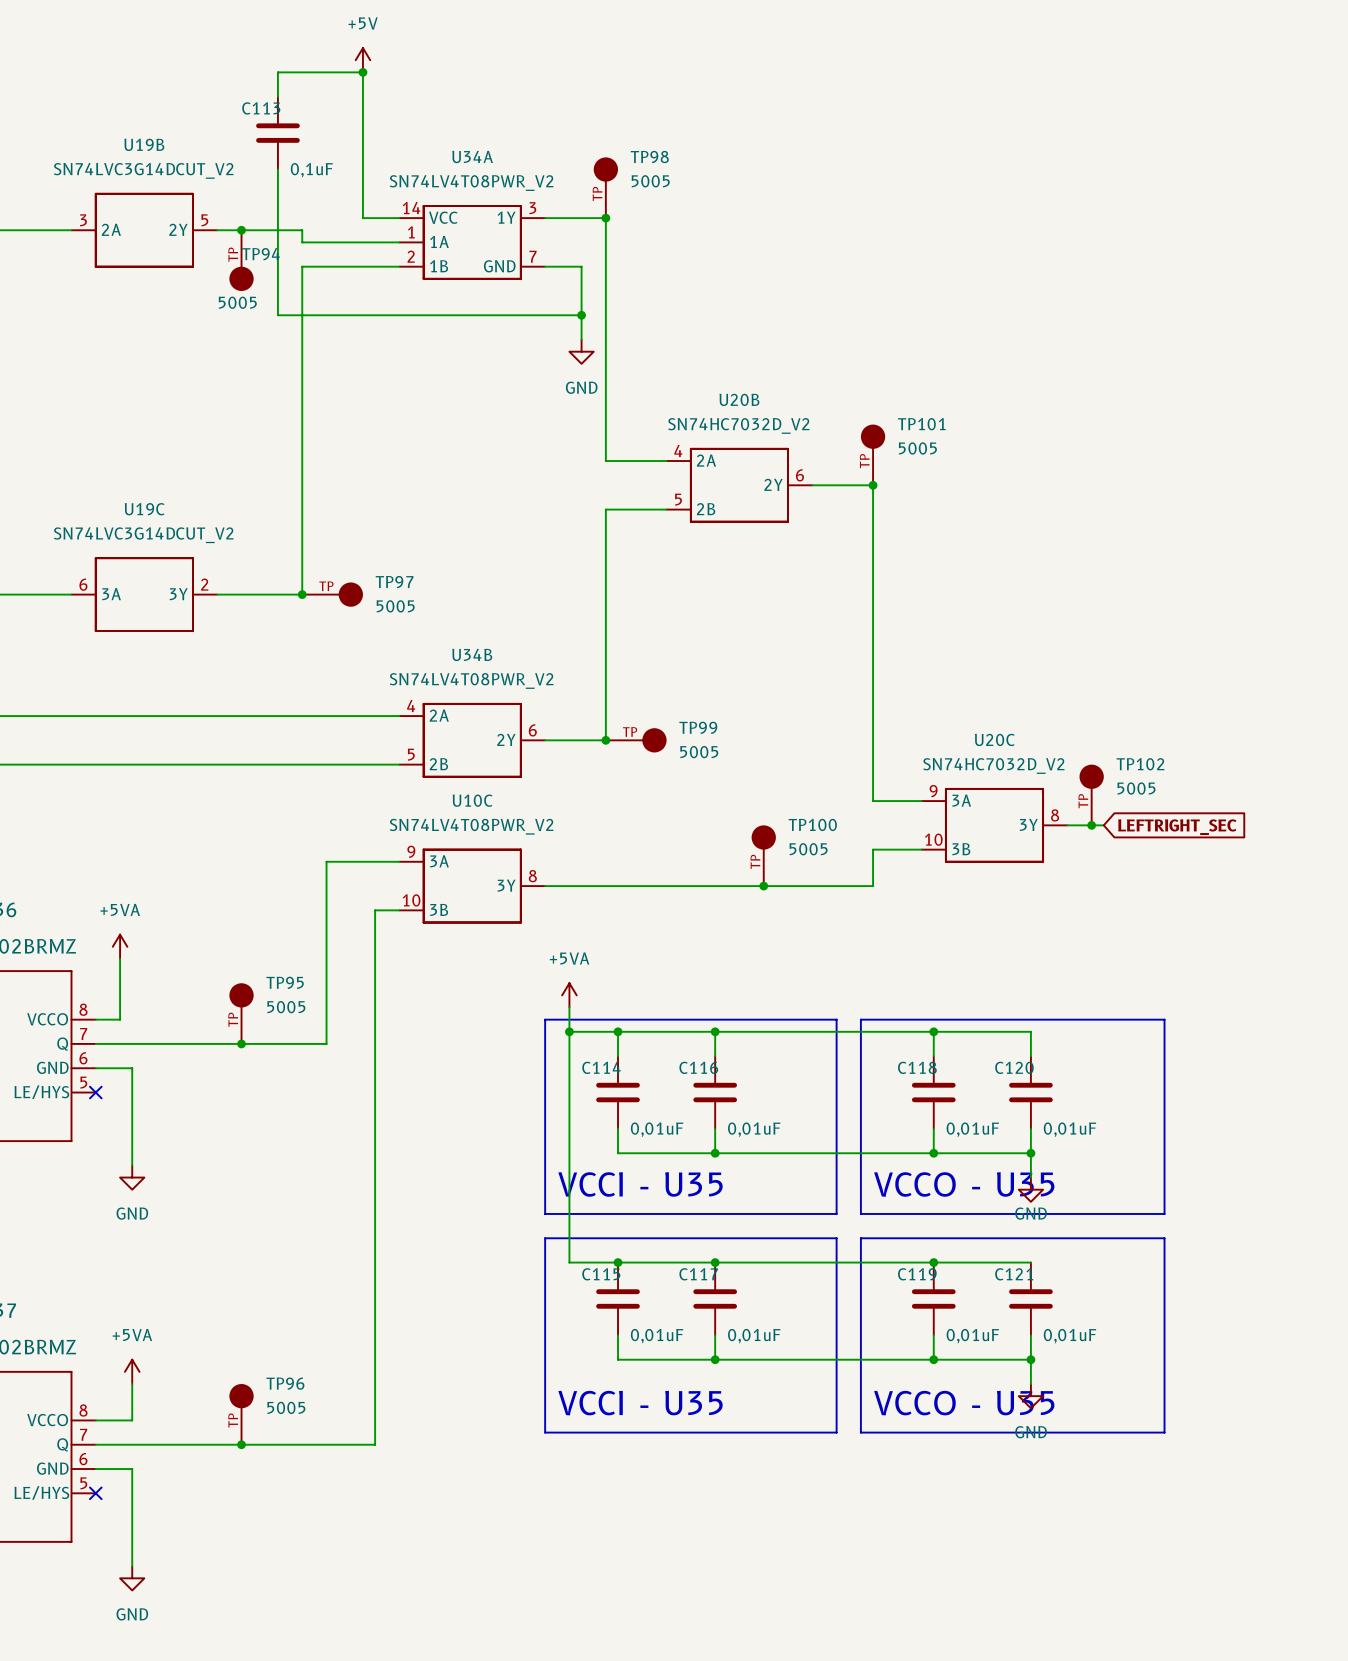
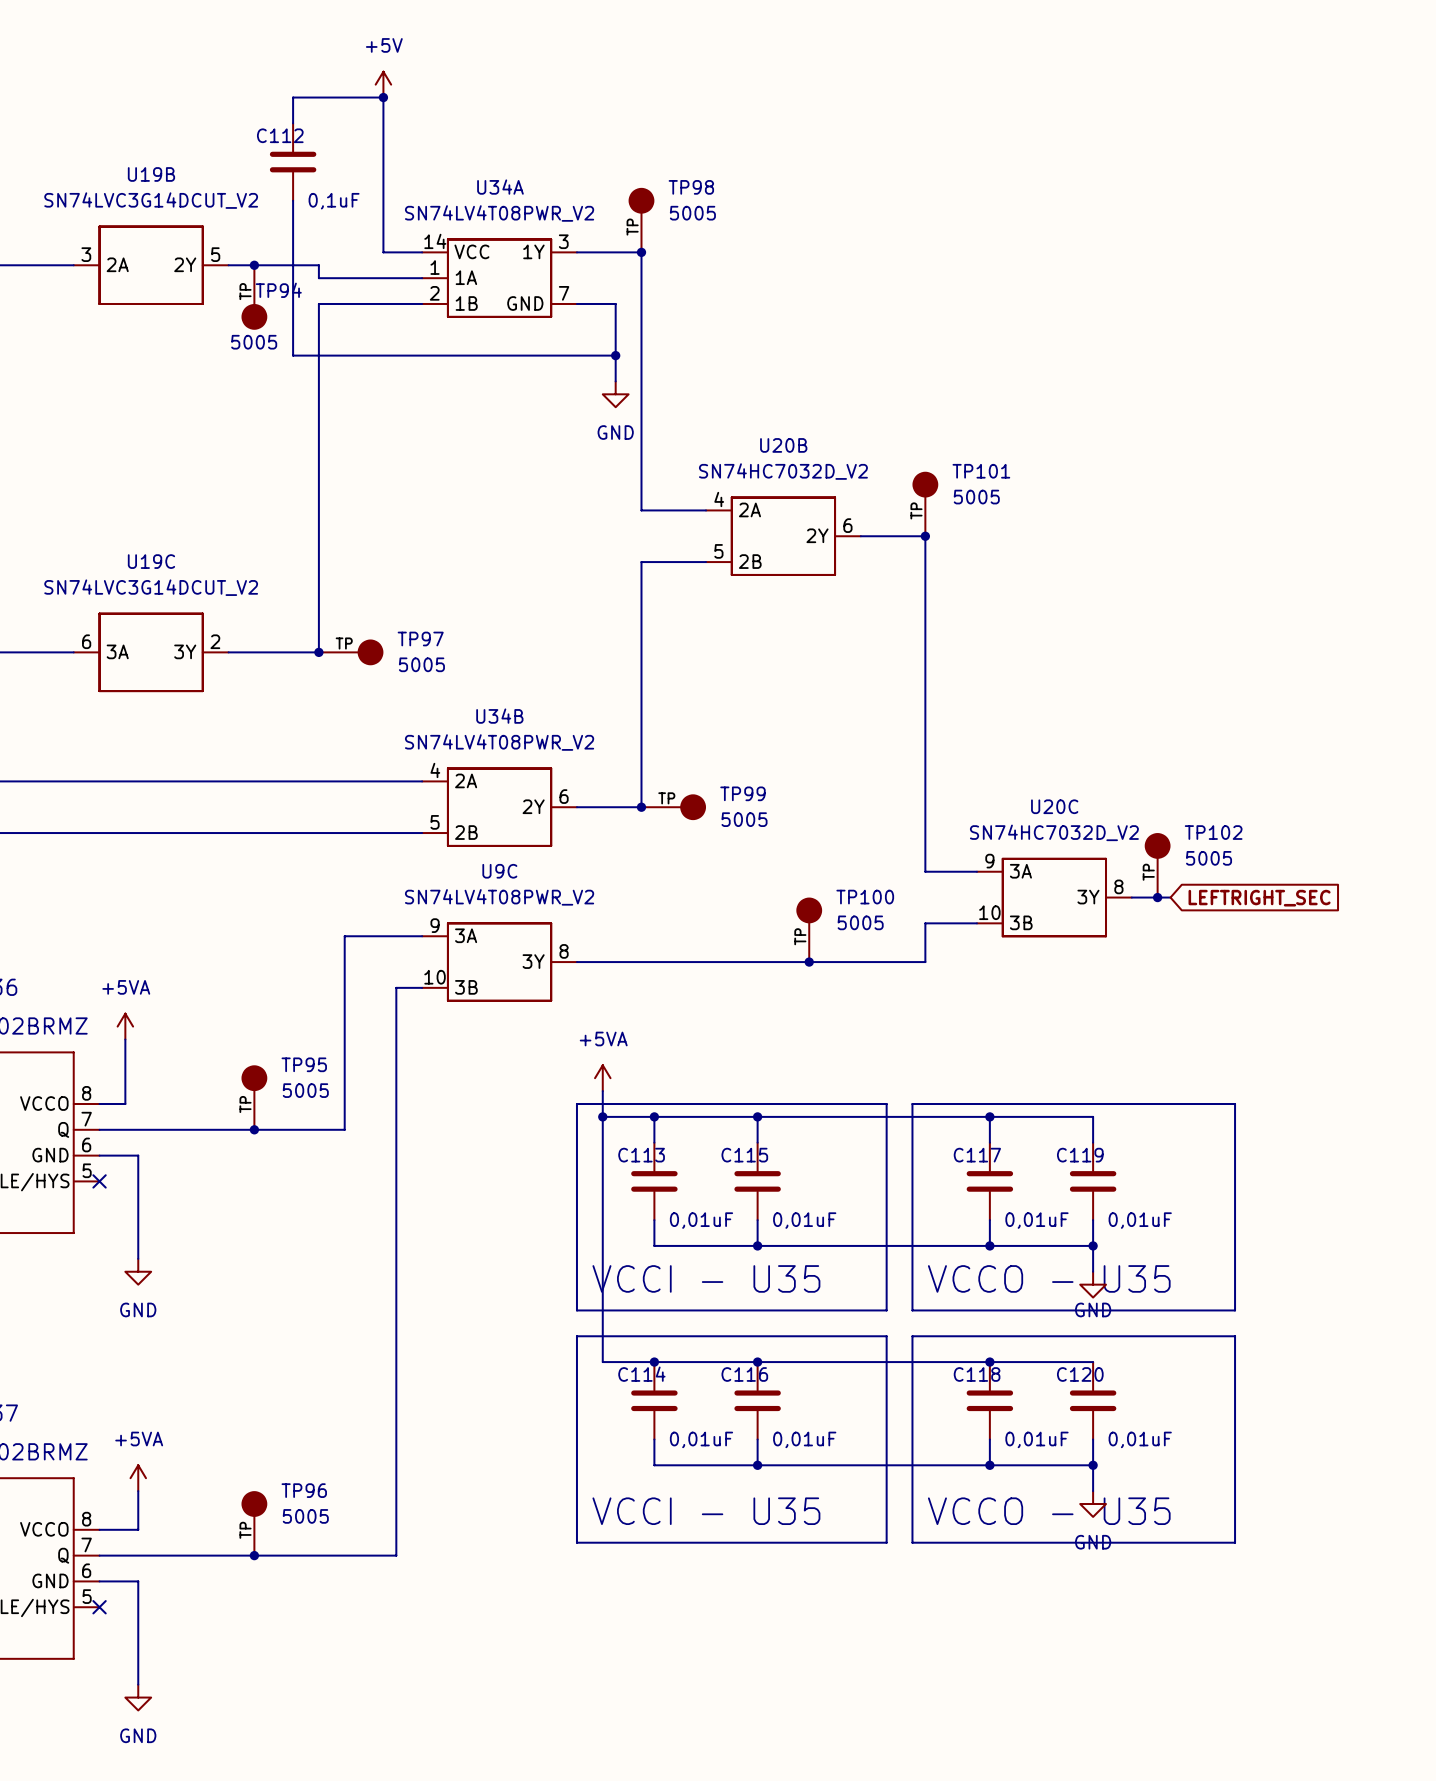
C113 name: C113 (261, 108) -> C112 (280, 135)
U10C name: U10C (472, 800) -> U9C (499, 871)
C114 name: C114 (601, 1067) -> C113 (641, 1155)
C116 name: C116 (698, 1067) -> C115 (744, 1155)
C118 name: C118 (917, 1067) -> C117 (977, 1155)
C120 name: C120 (1014, 1067) -> C119 (1080, 1155)
C115 name: C115 (601, 1274) -> C114 (641, 1374)
C117 name: C117 (698, 1274) -> C116 (744, 1374)
C119 name: C119 (917, 1274) -> C118 (977, 1374)
C121 name: C121 (1014, 1274) -> C120 (1080, 1374)

